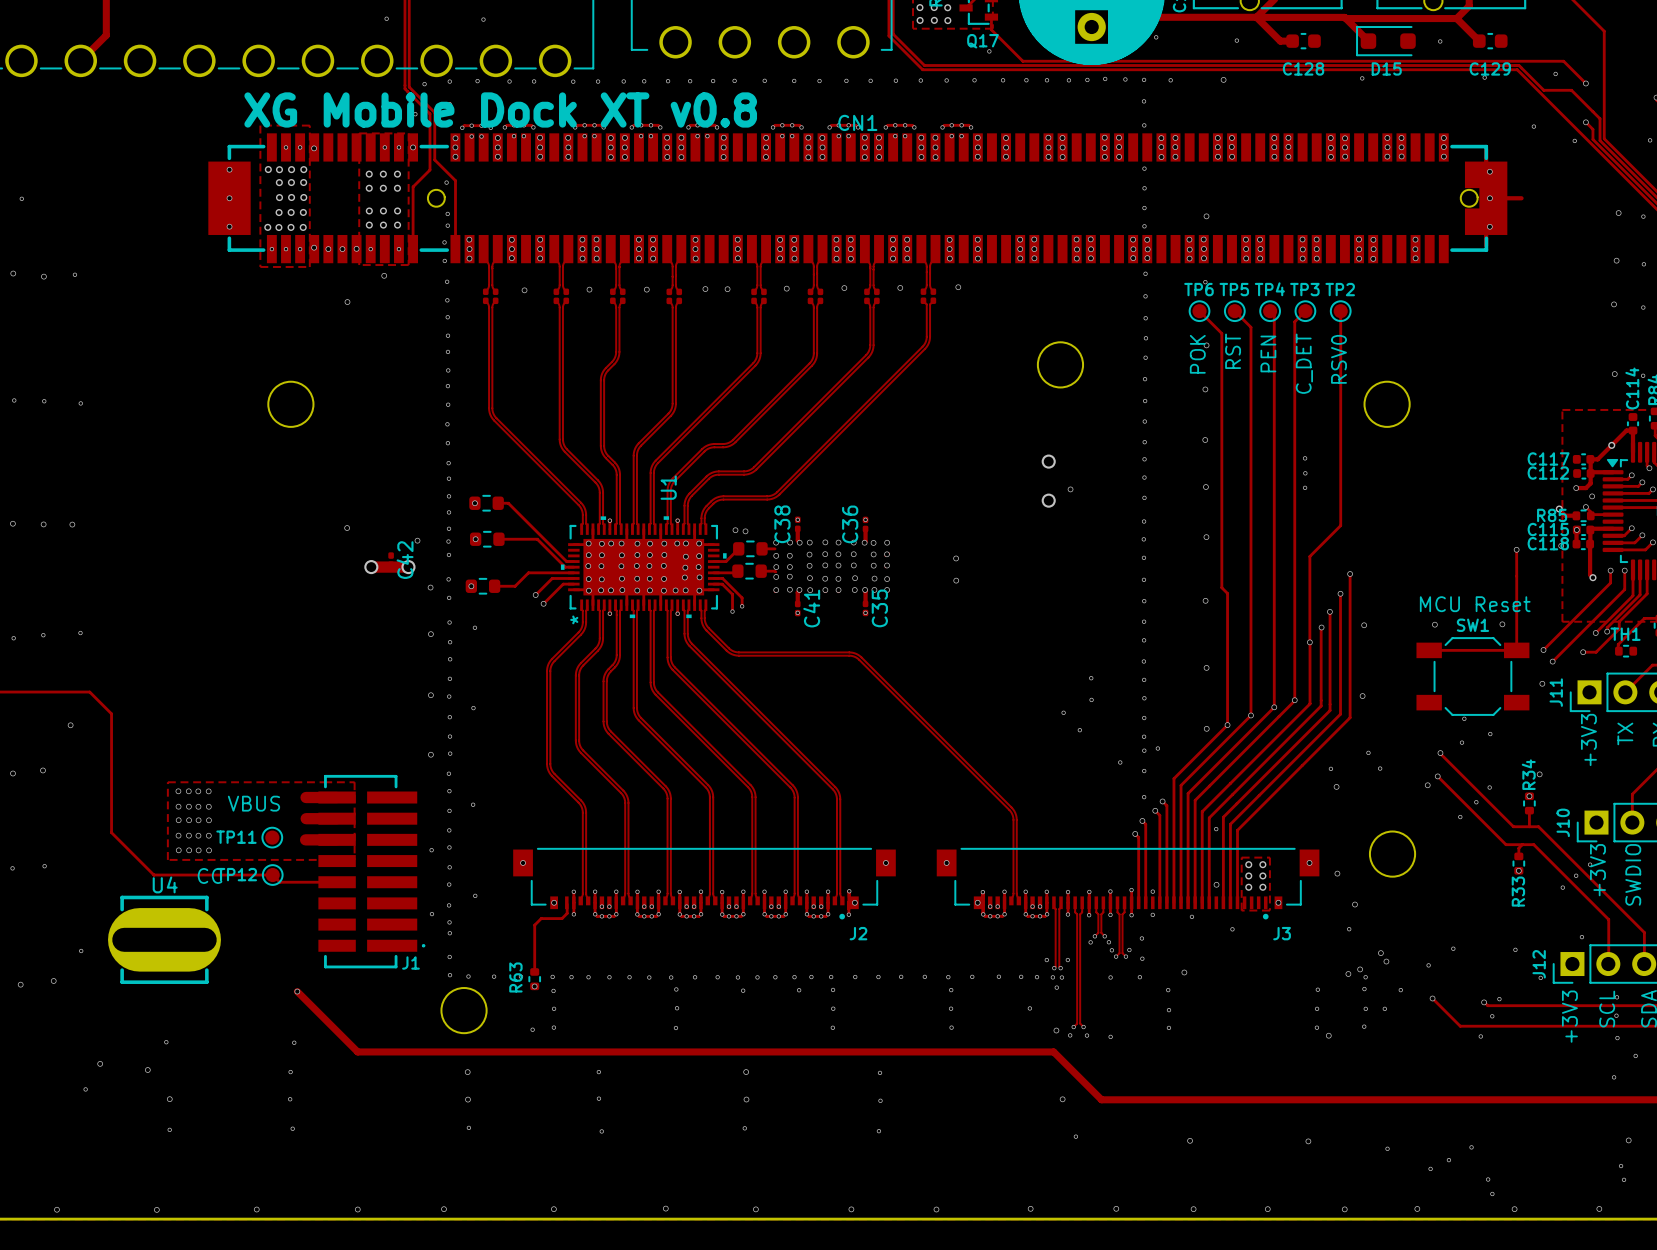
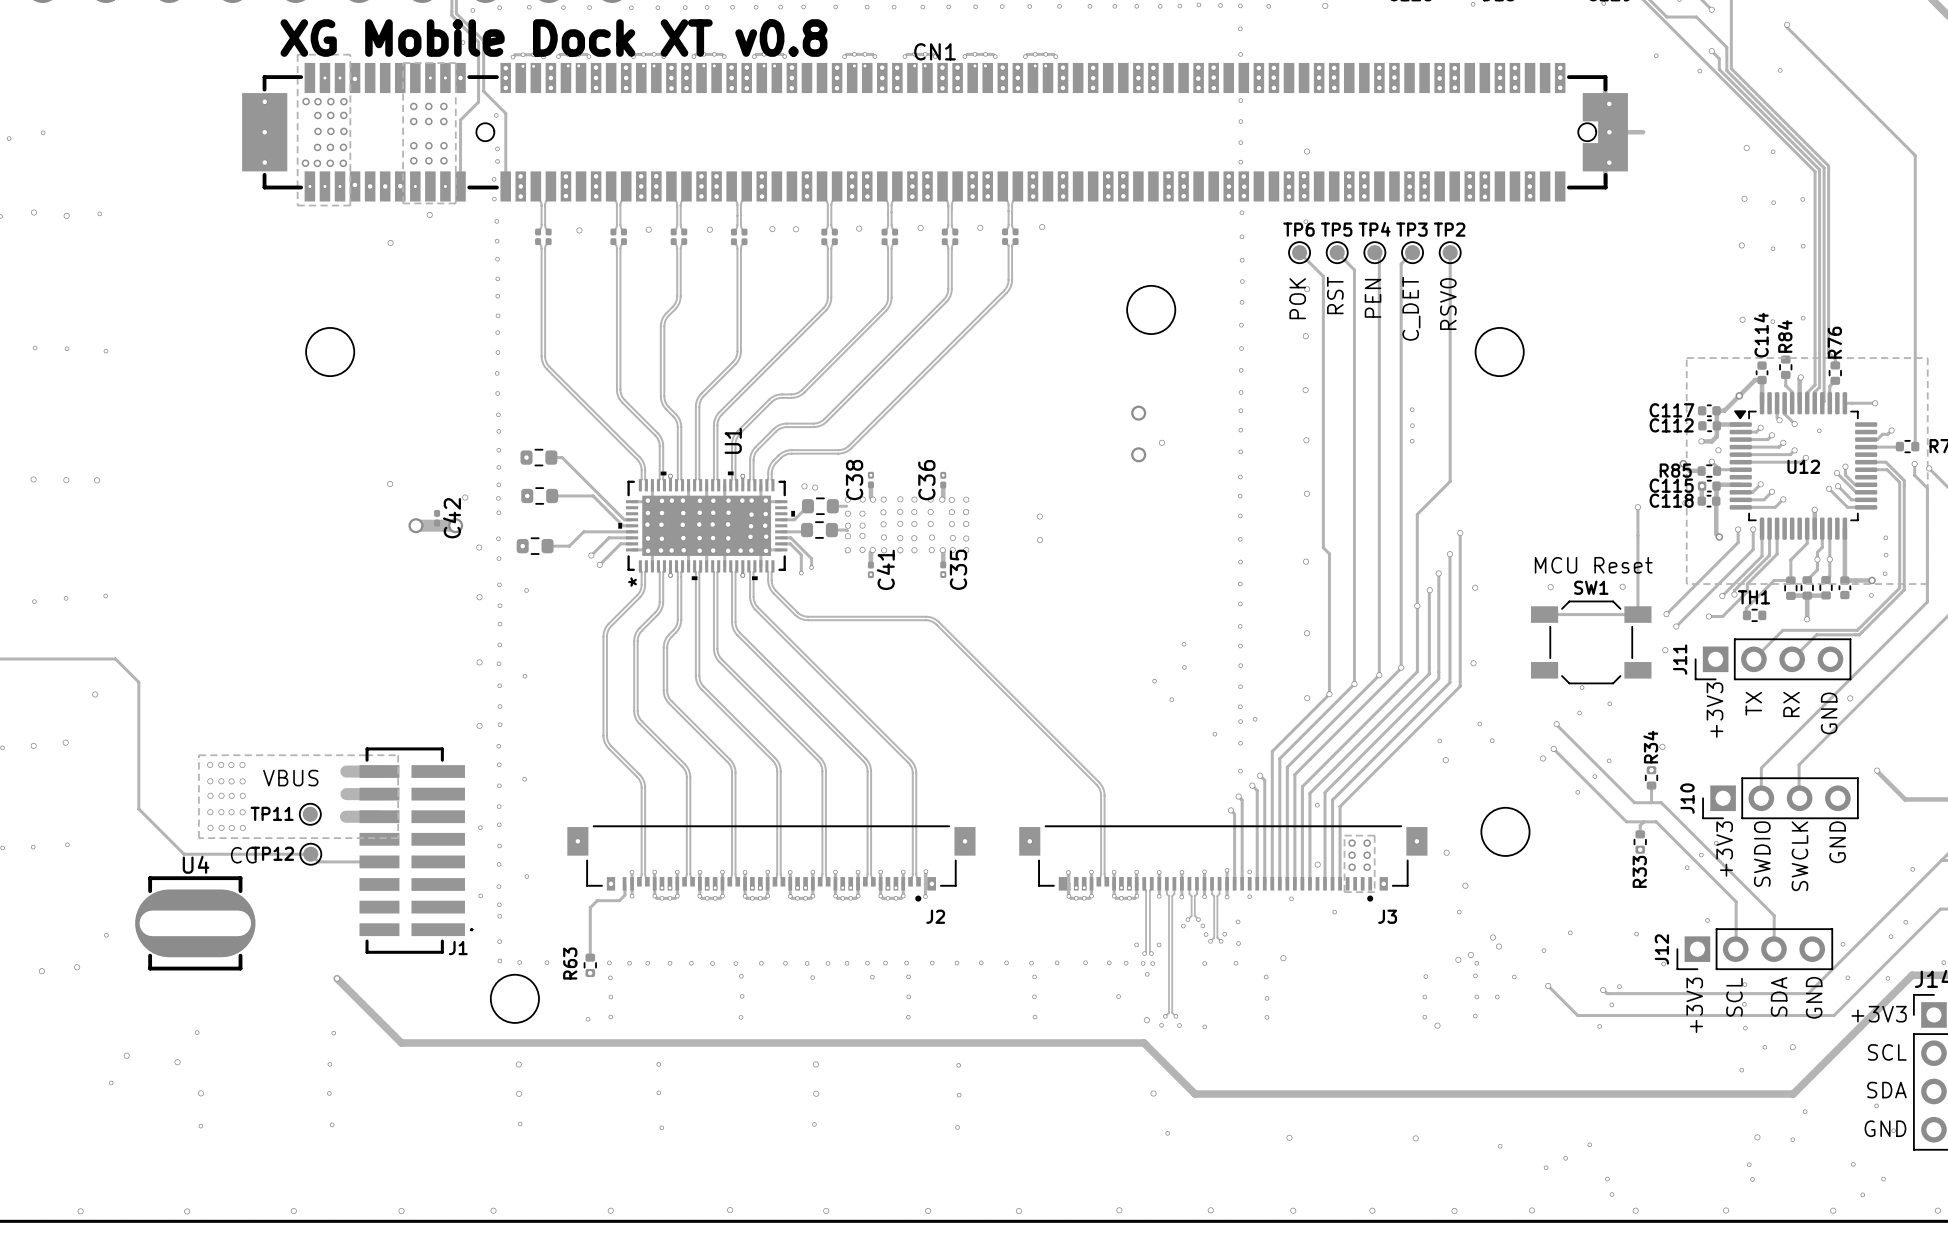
via: (977, 902) -> none

